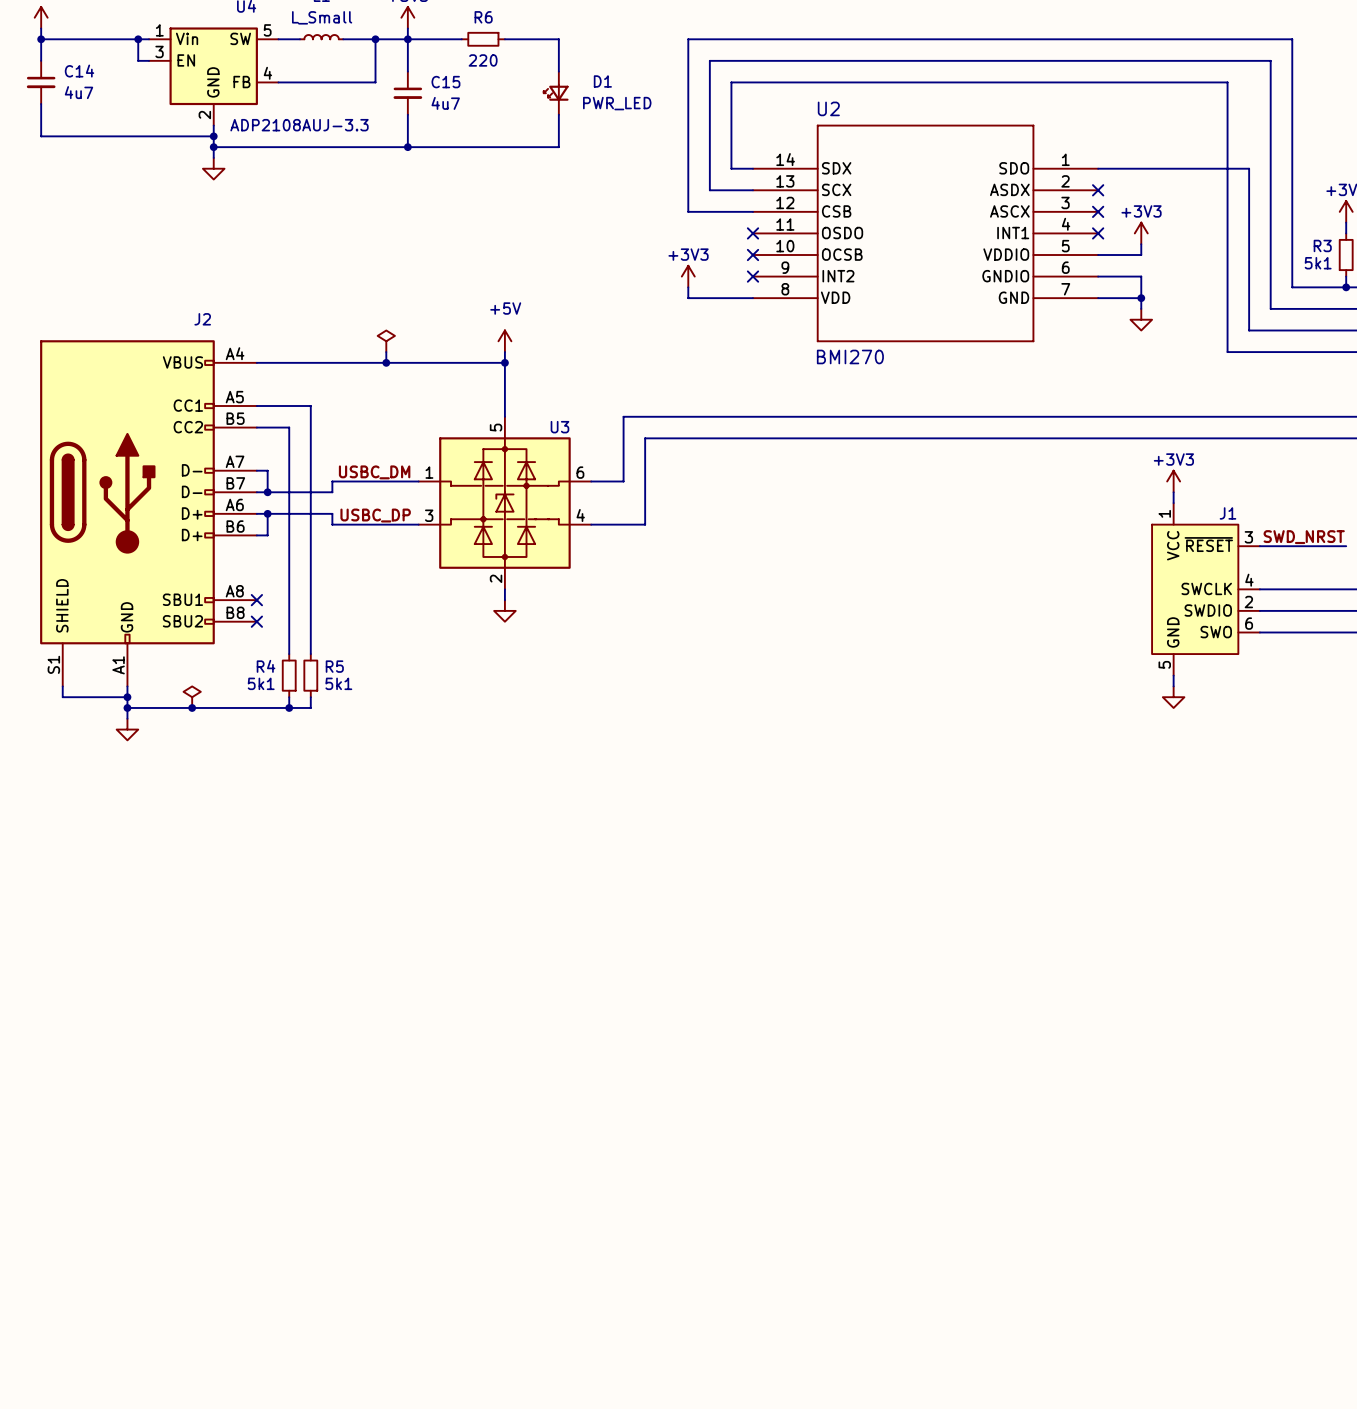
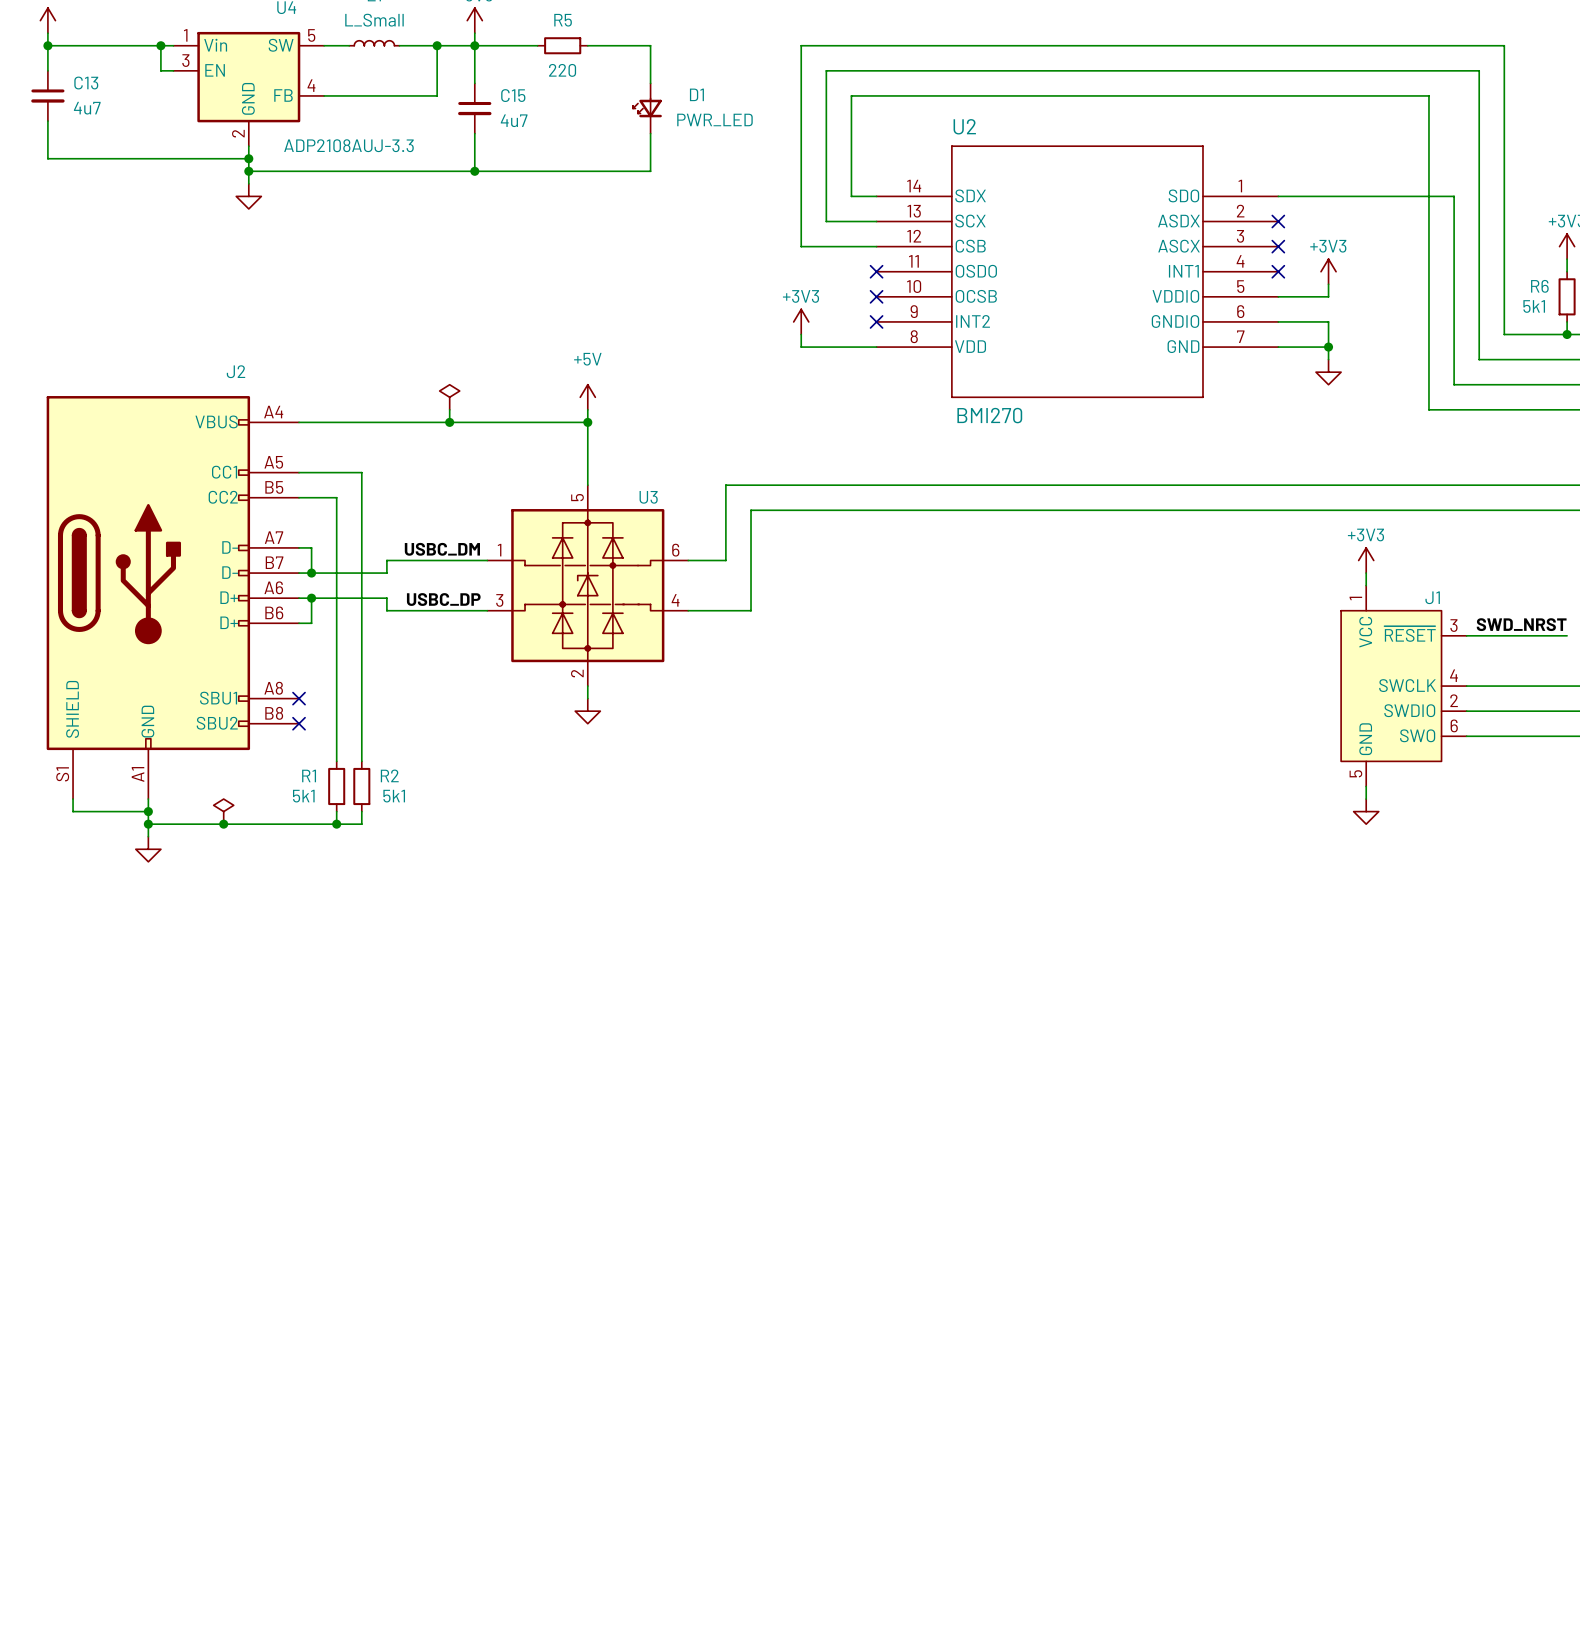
R6 name: R6 (483, 17) -> R5 (563, 20)
C14 name: C14 (79, 71) -> C13 (86, 83)
R3 name: R3 (1322, 245) -> R6 (1539, 286)
R4 name: R4 (266, 666) -> R1 (309, 775)
R5 name: R5 (334, 666) -> R2 (389, 775)

